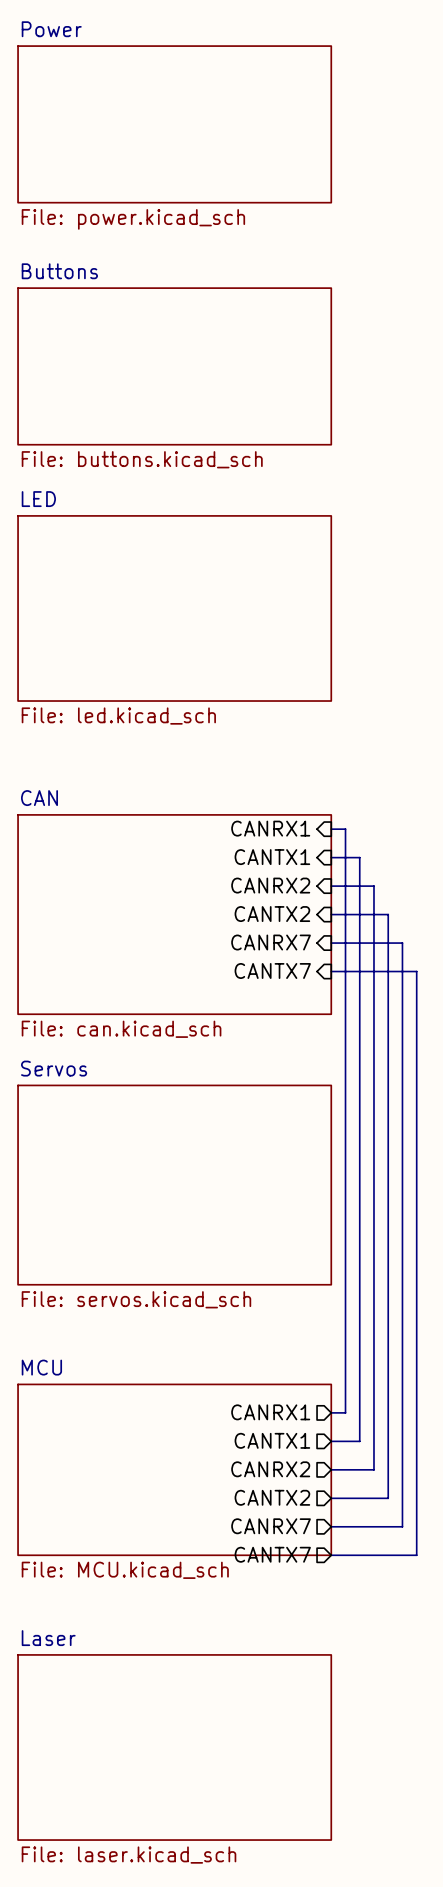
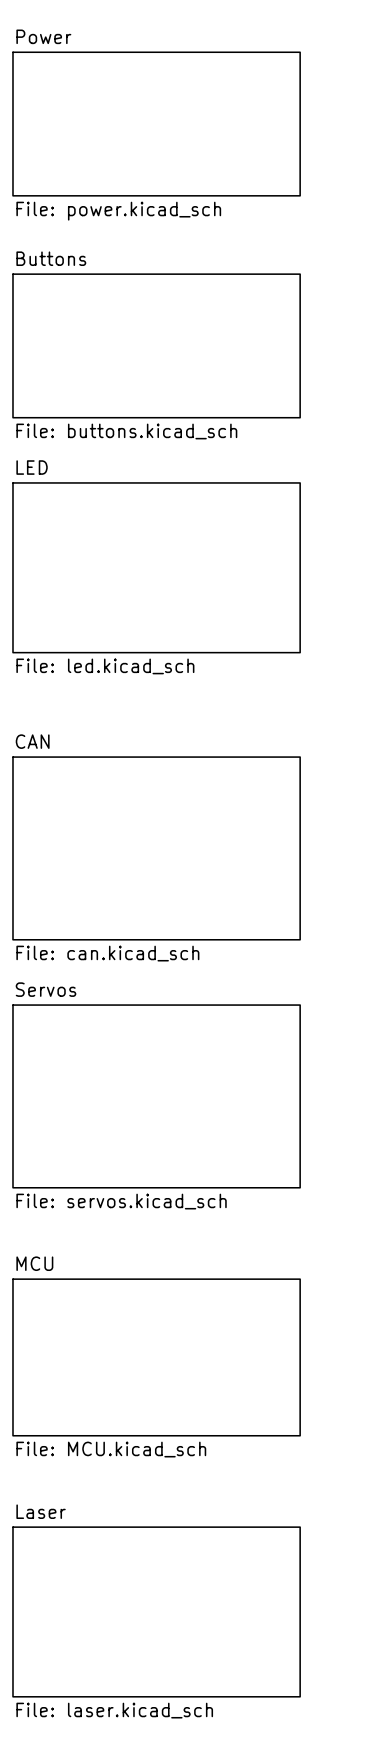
sheet pin: CANRX1 (270, 828) -> none
wire: (331, 829) (345, 829) (345, 1412) (331, 1412) -> none
sheet pin: CANTX1 (272, 857) -> none
wire: (331, 857) (359, 857) (359, 1441) (331, 1441) -> none
sheet pin: CANRX2 (270, 885) -> none
wire: (331, 886) (373, 886) (373, 1469) (331, 1469) -> none
sheet pin: CANTX2 (272, 914) -> none
wire: (331, 914) (388, 914) (388, 1498) (331, 1498) -> none
sheet pin: CANRX7 (271, 942) -> none
wire: (331, 943) (402, 943) (402, 1526) (331, 1526) -> none
sheet pin: CANTX7 (272, 970) -> none
wire: (331, 971) (416, 971) (416, 1555) (331, 1555) -> none
sheet pin: CANRX1 (270, 1412) -> none
sheet pin: CANTX1 (272, 1440) -> none
sheet pin: CANRX2 (270, 1469) -> none
sheet pin: CANTX2 (272, 1497) -> none
sheet pin: CANRX7 (271, 1526) -> none
sheet pin: CANTX7 (272, 1554) -> none

